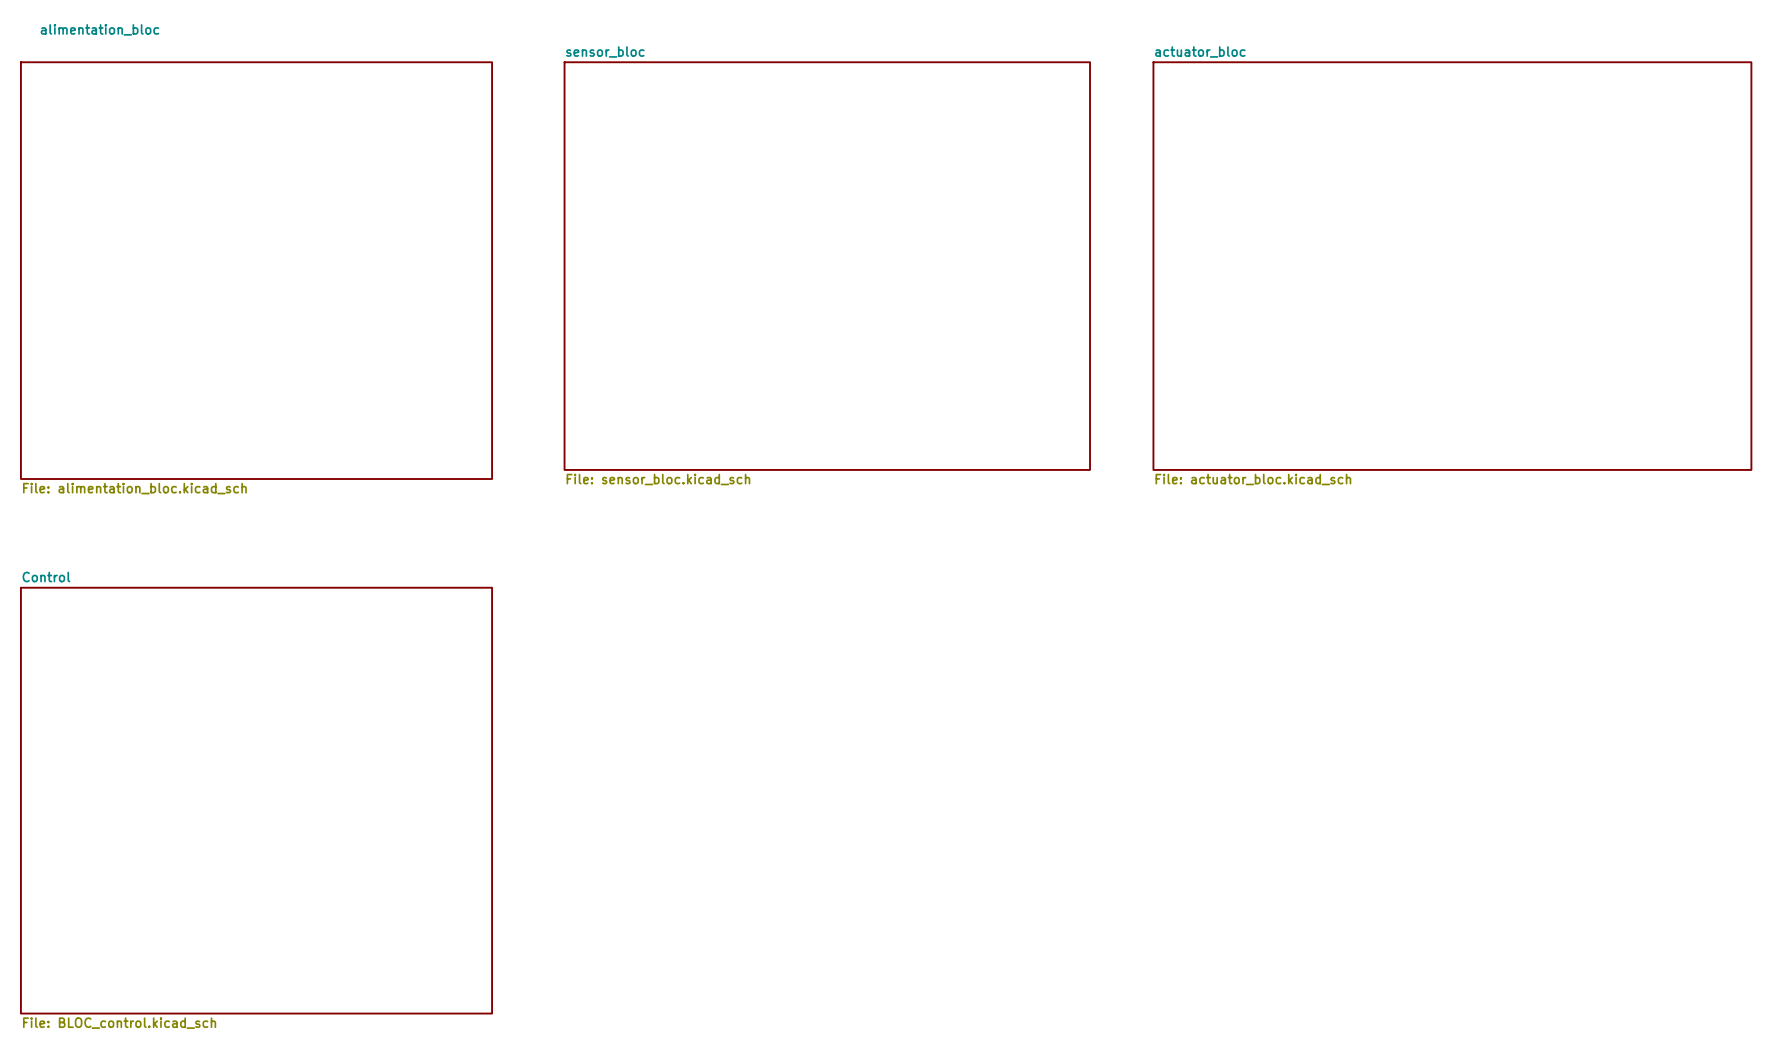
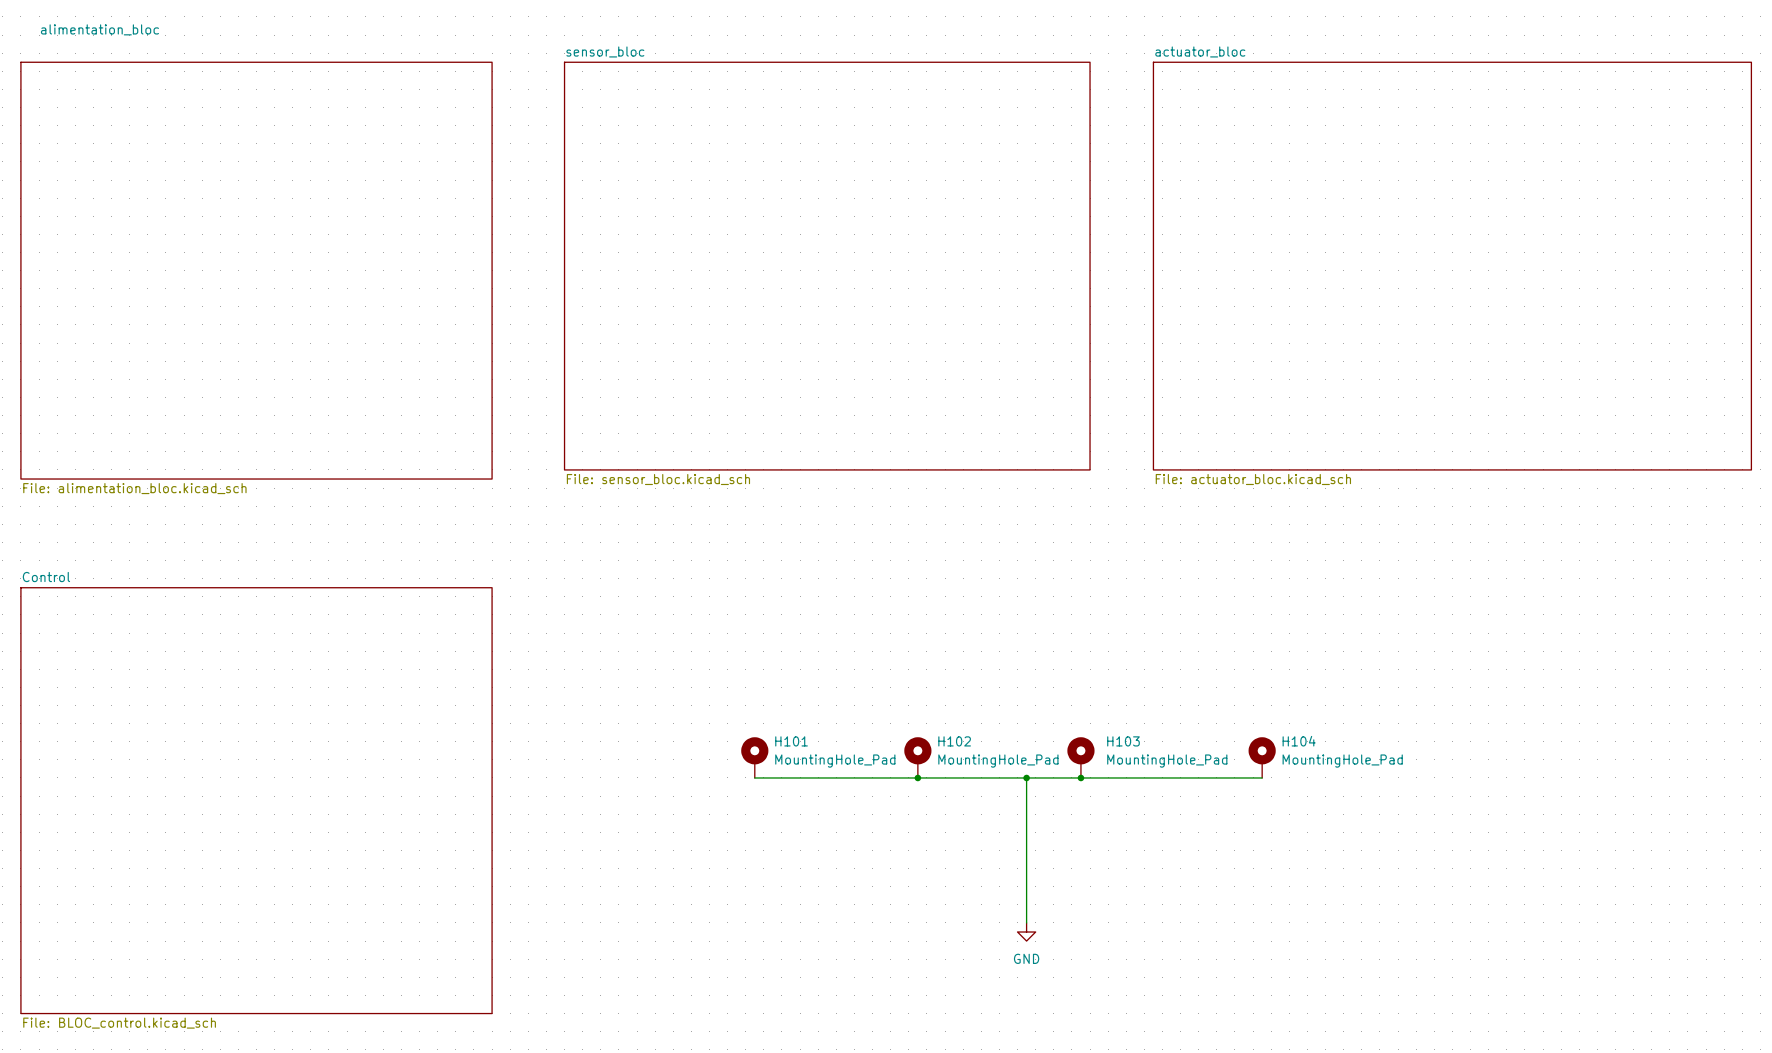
H101: none -> MountingHole_Pad (754, 757)
H102: none -> MountingHole_Pad (917, 757)
H103: none -> MountingHole_Pad (1080, 757)
H104: none -> MountingHole_Pad (1262, 757)
wire: none -> (754, 777) (1262, 777)
junction: none -> (917, 777)
wire: none -> (1026, 777) (1026, 922)
junction: none -> (1026, 777)
junction: none -> (1080, 777)
power symbol: none -> GND (1026, 932)

